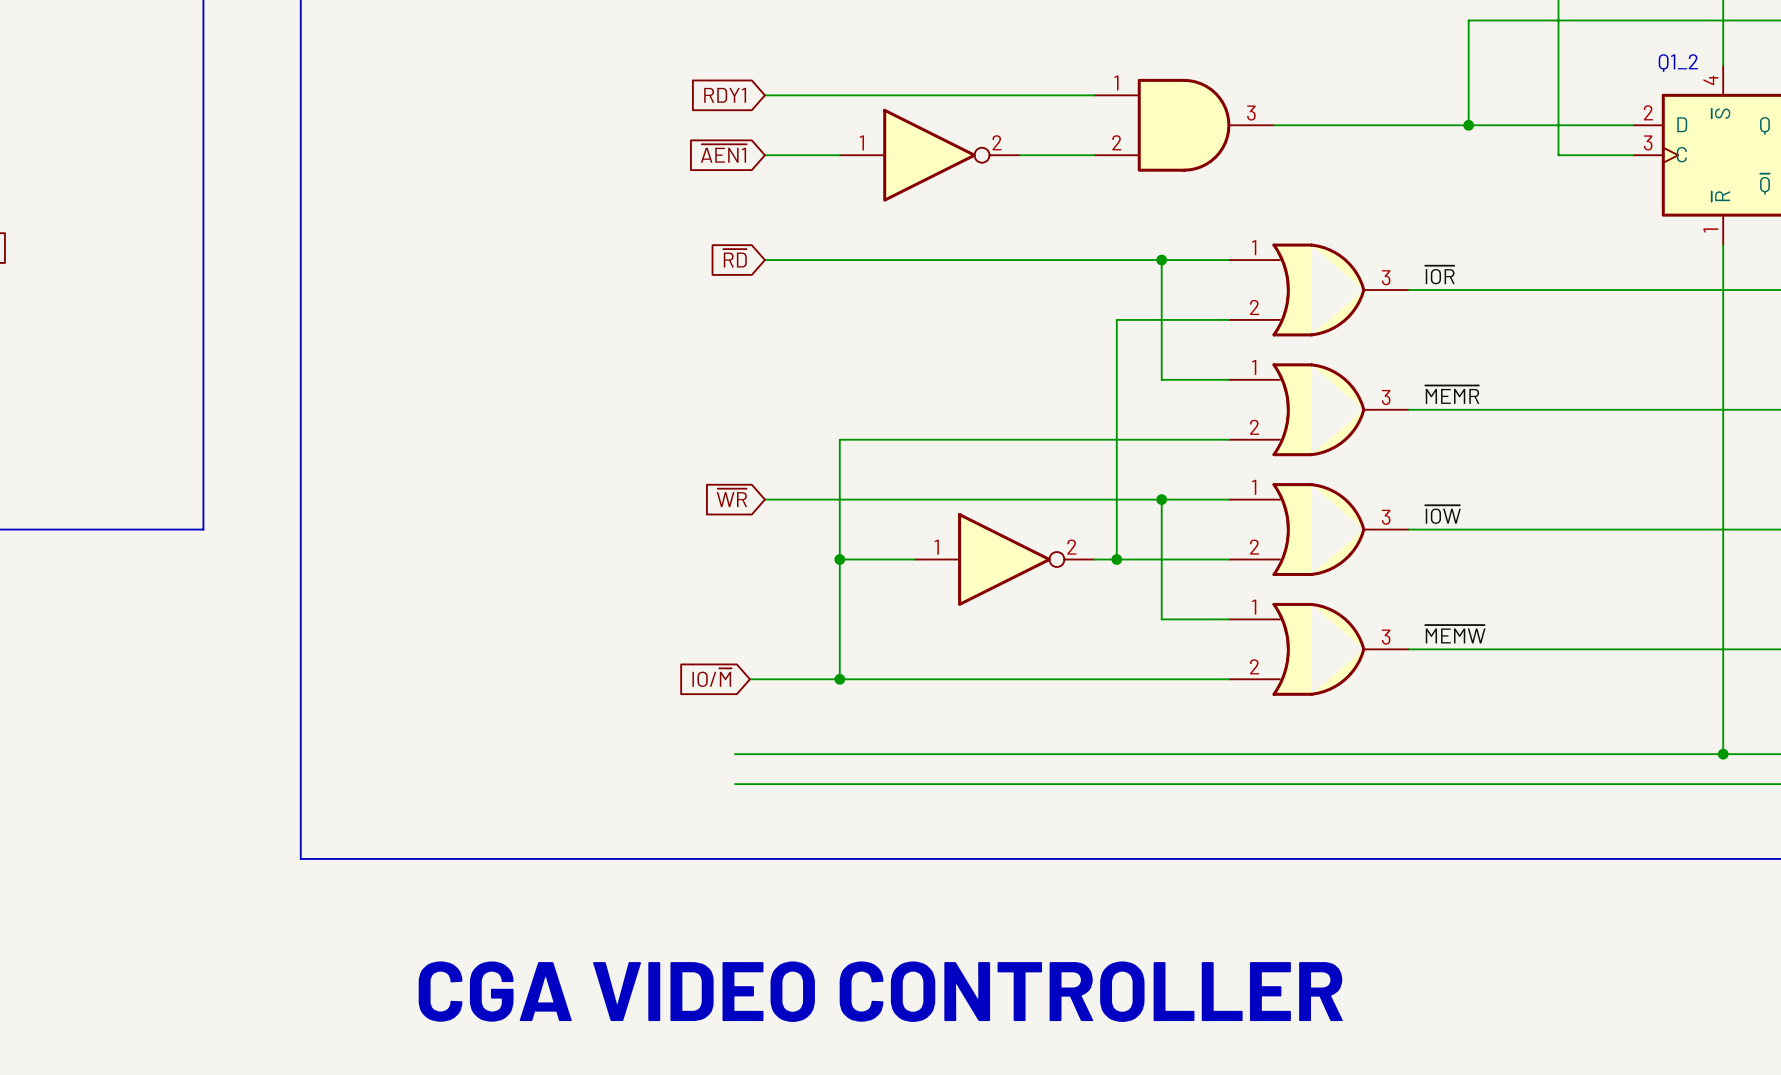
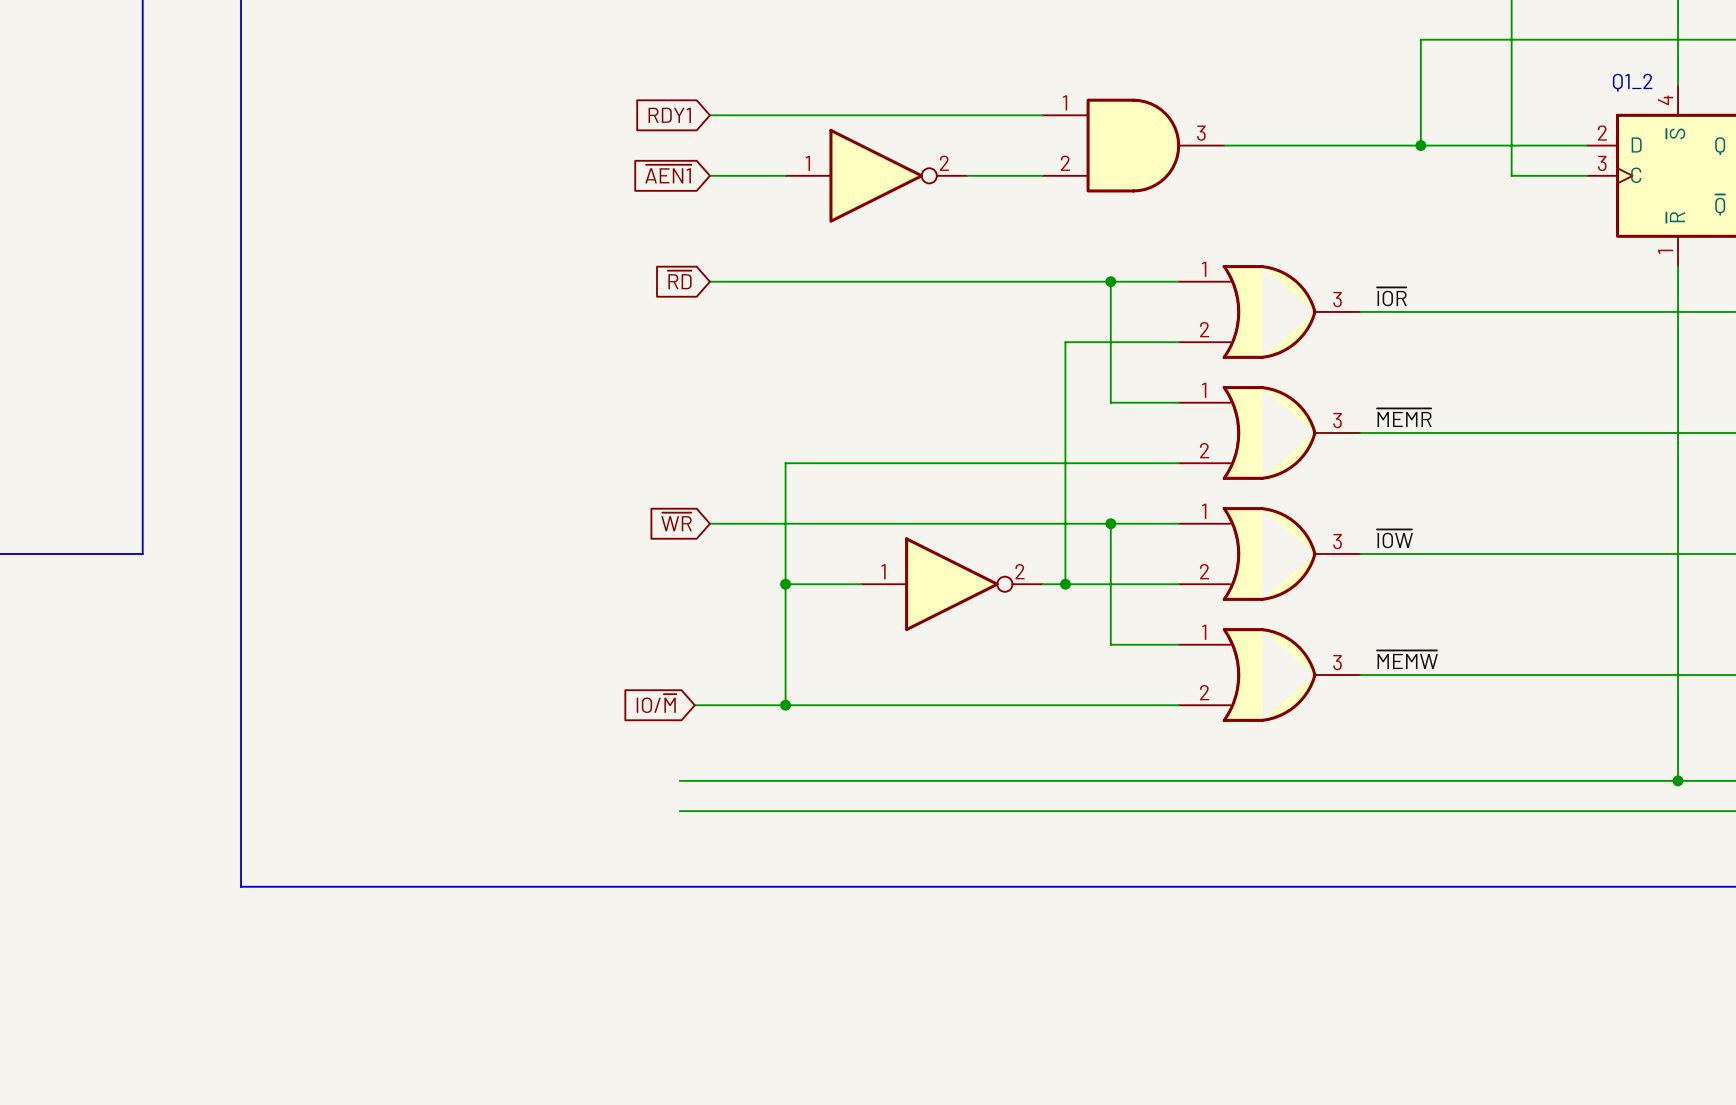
text: CGA VIDEO CONTROLLER (880, 991) -> none

